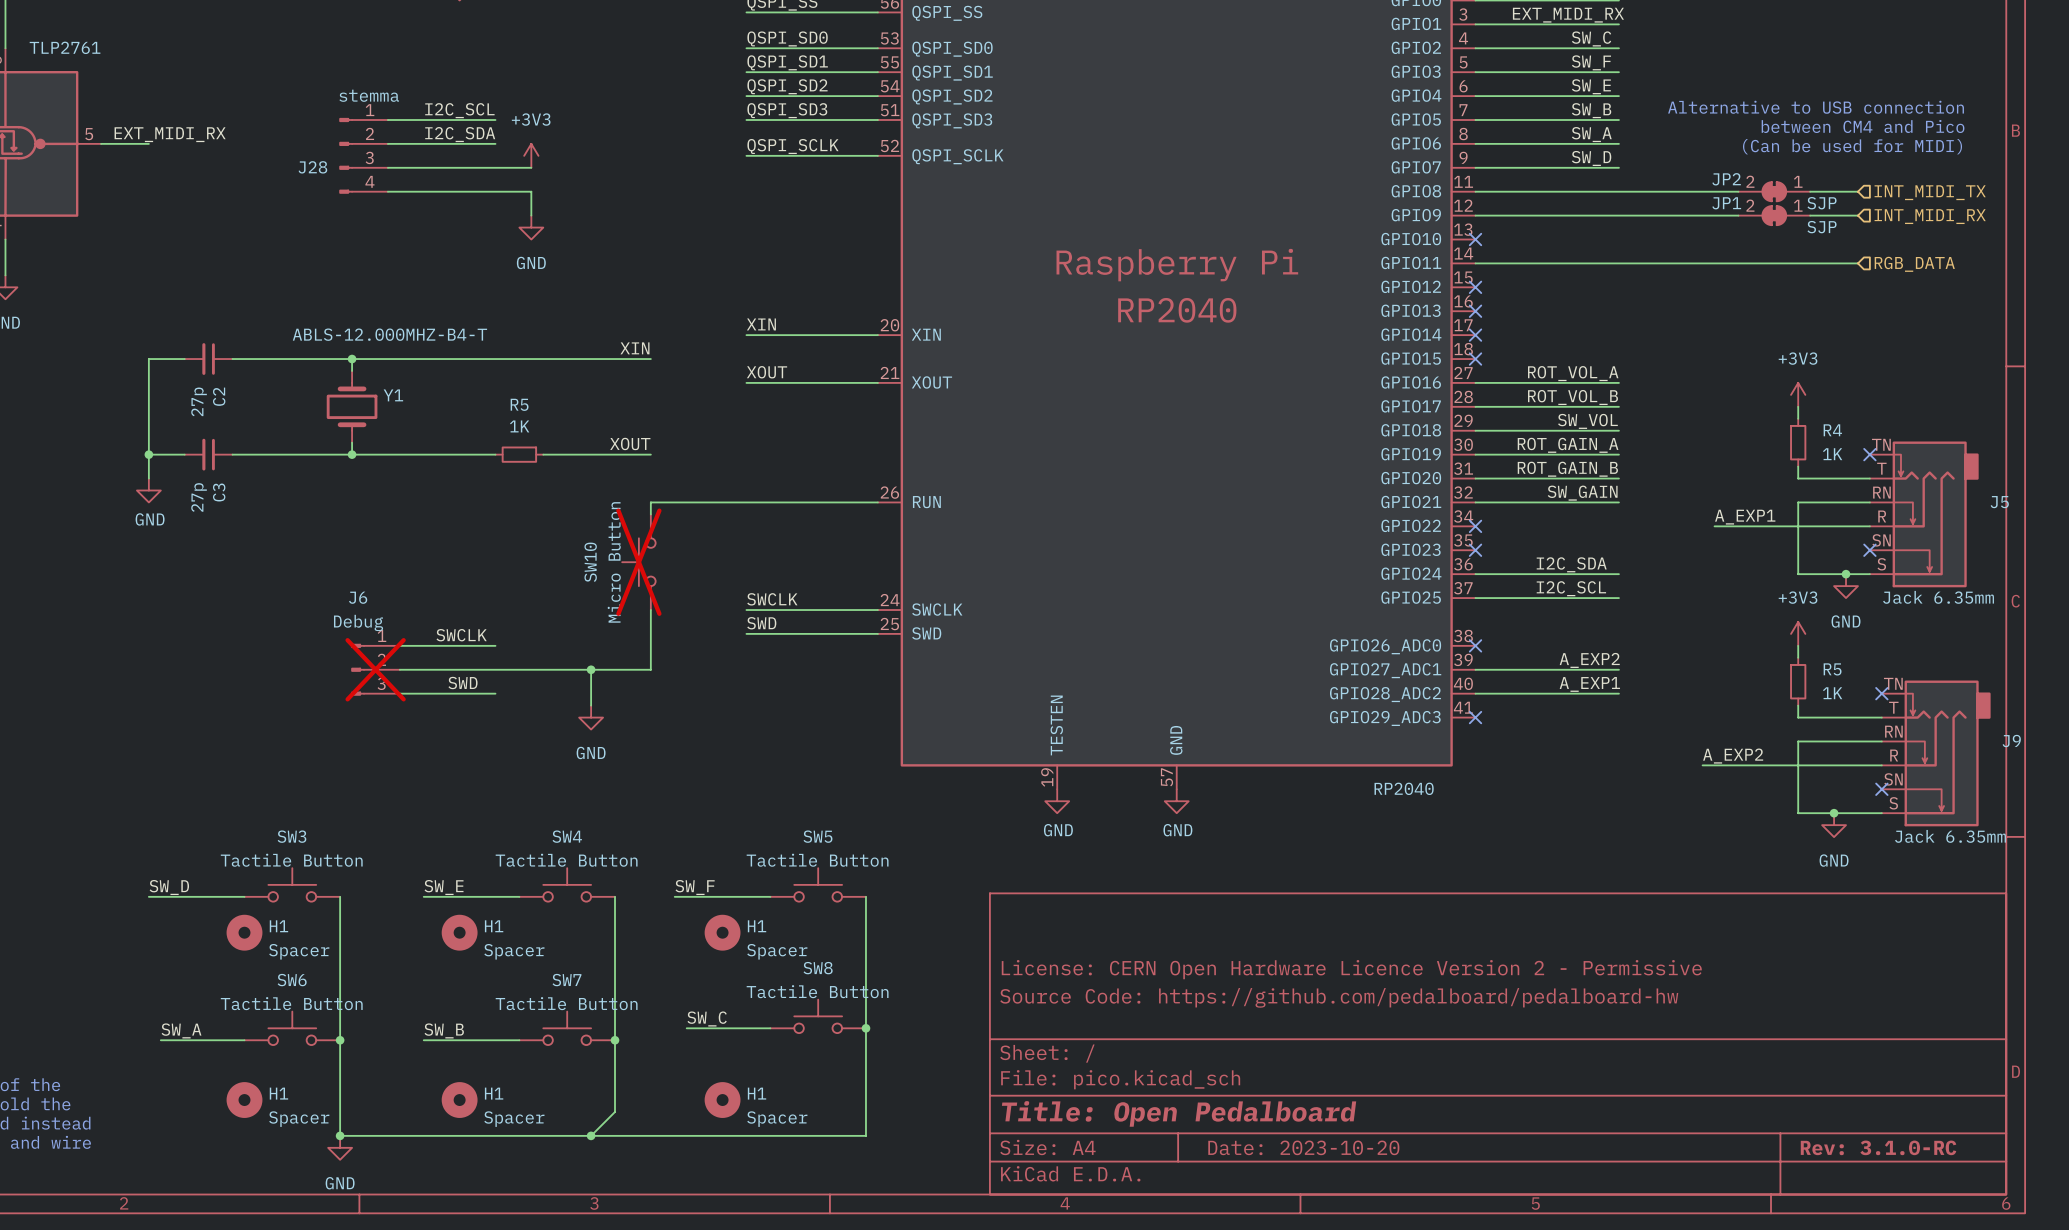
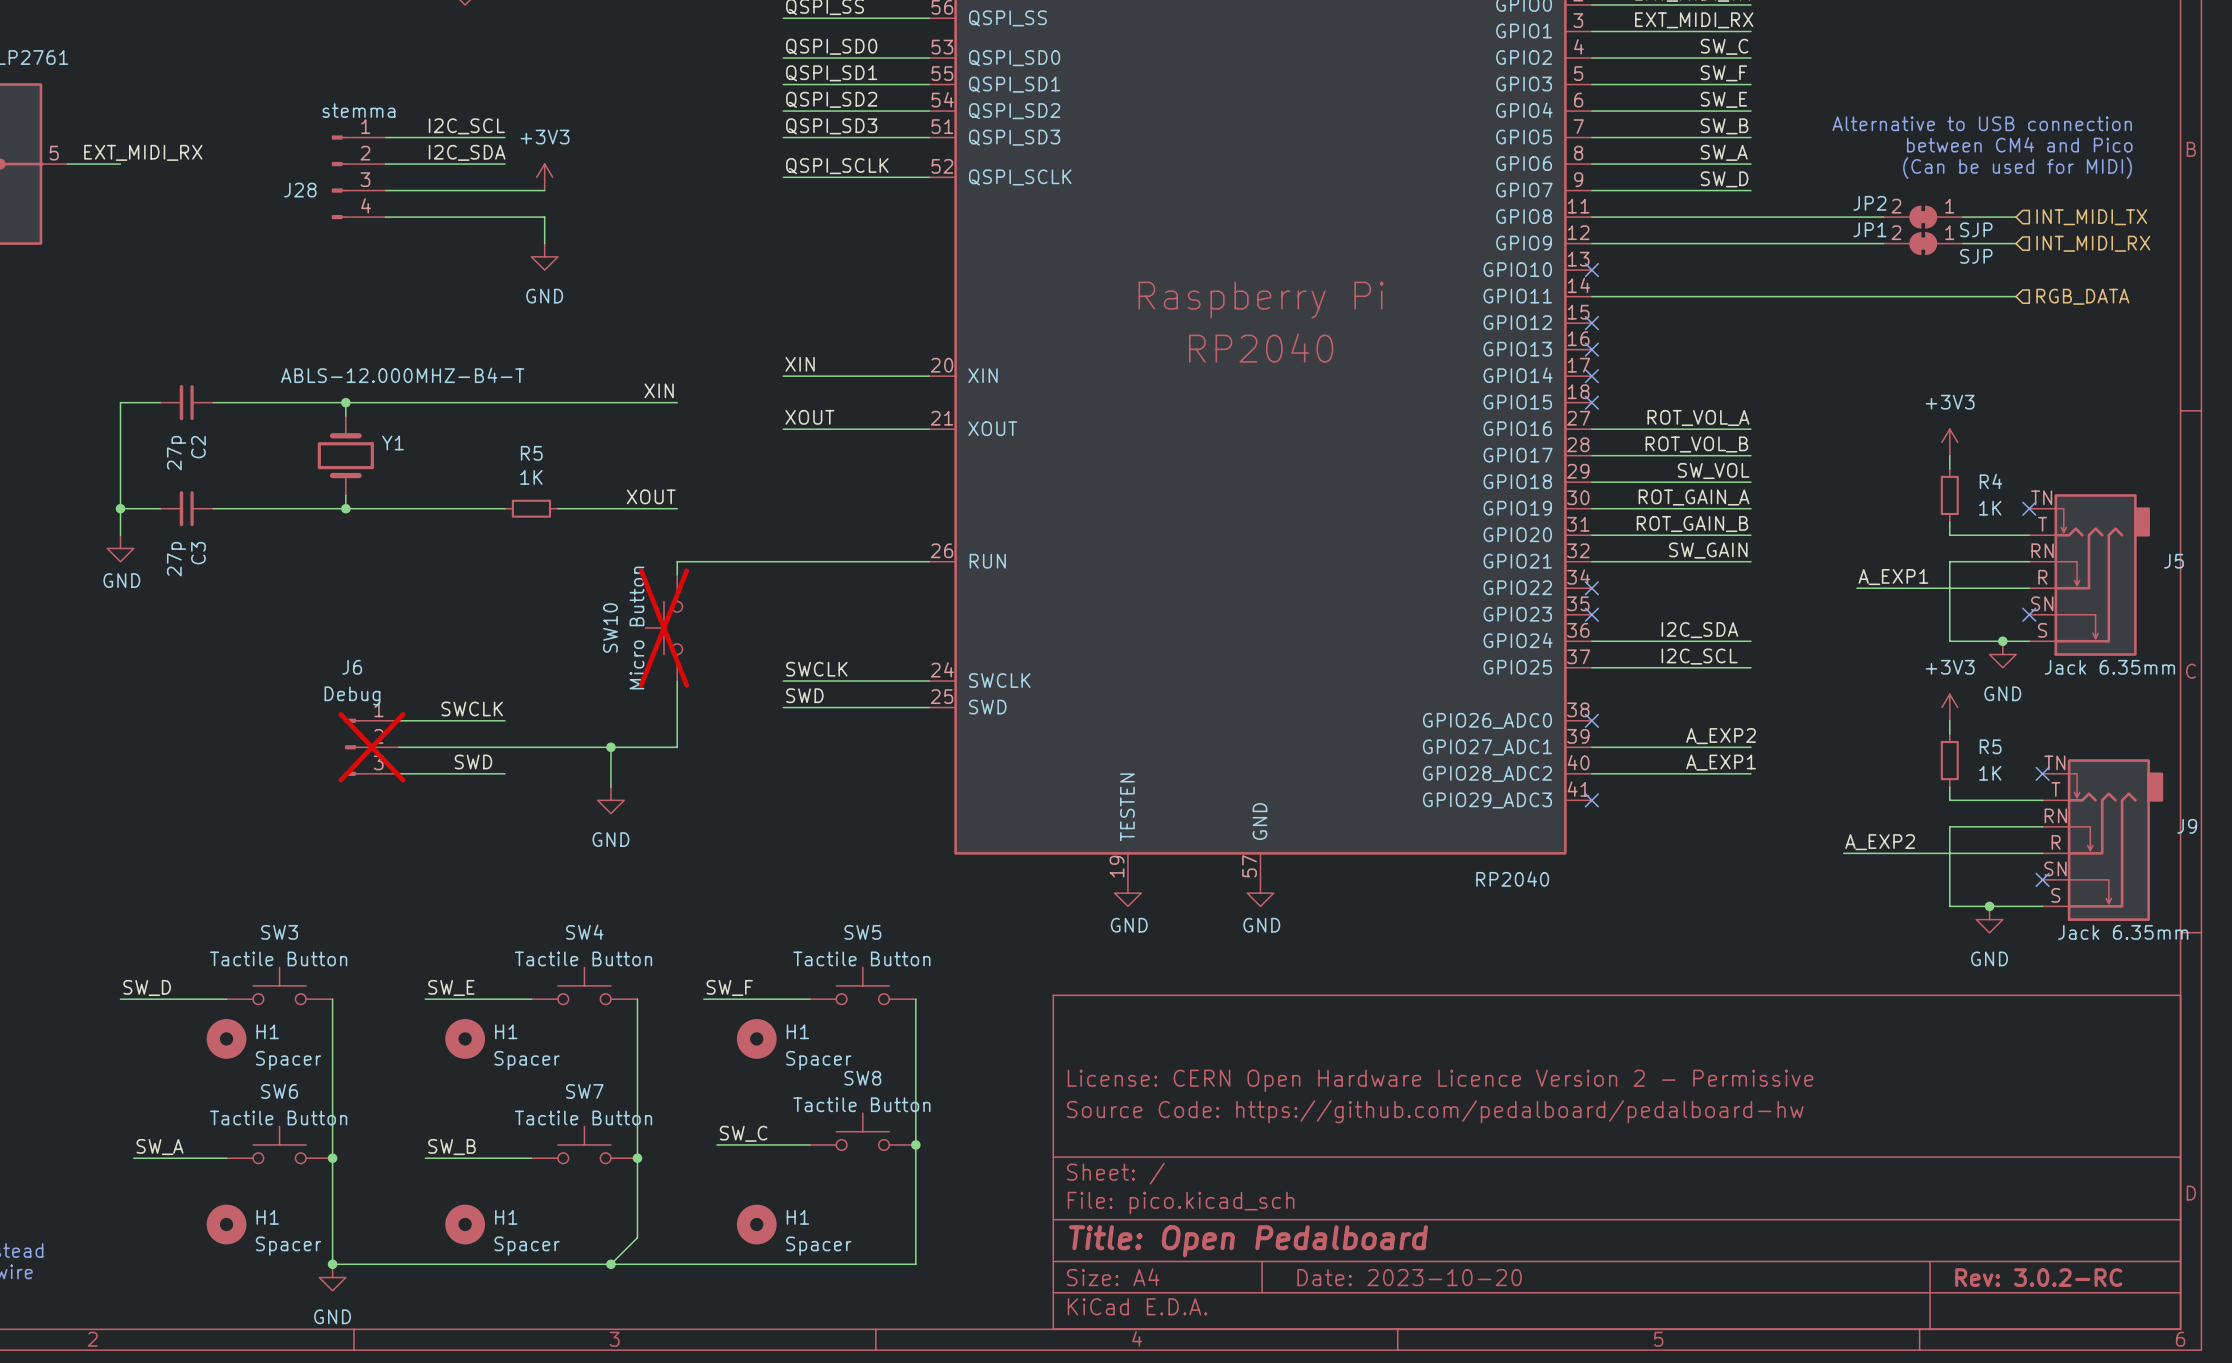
title block: Rev: 3.1.0-RC (1878, 1147) -> Rev: 3.0.2-RC (2038, 1277)

